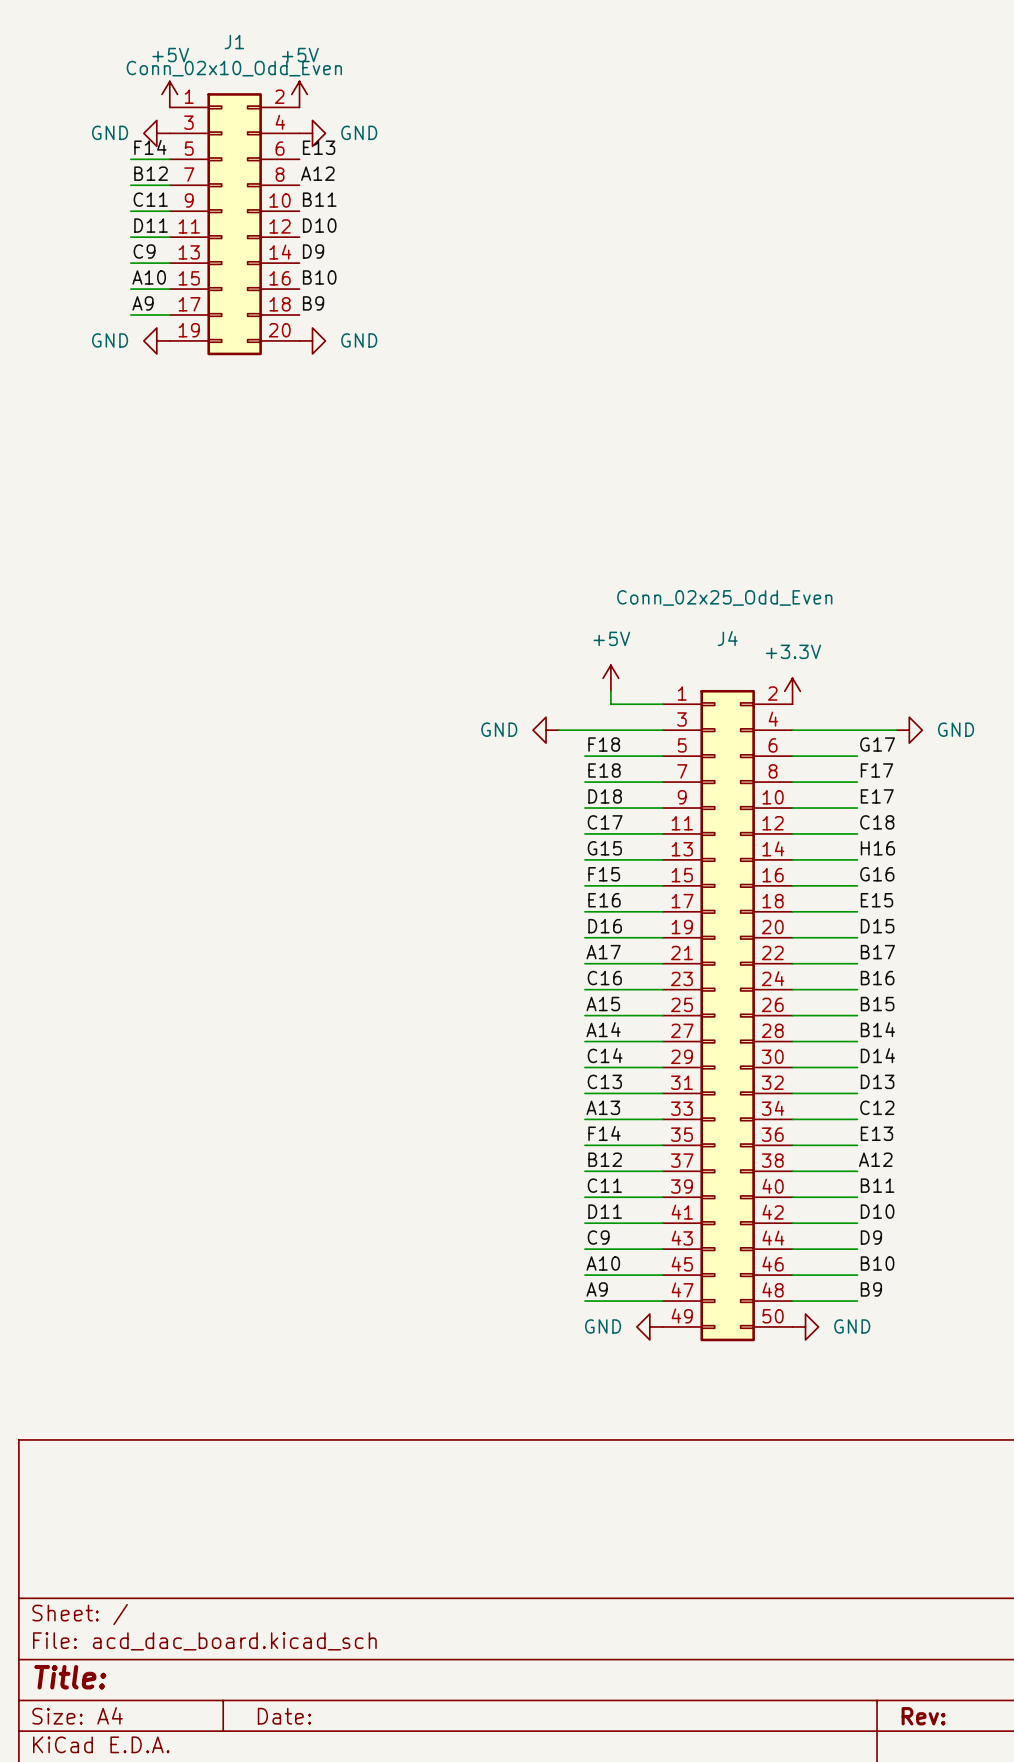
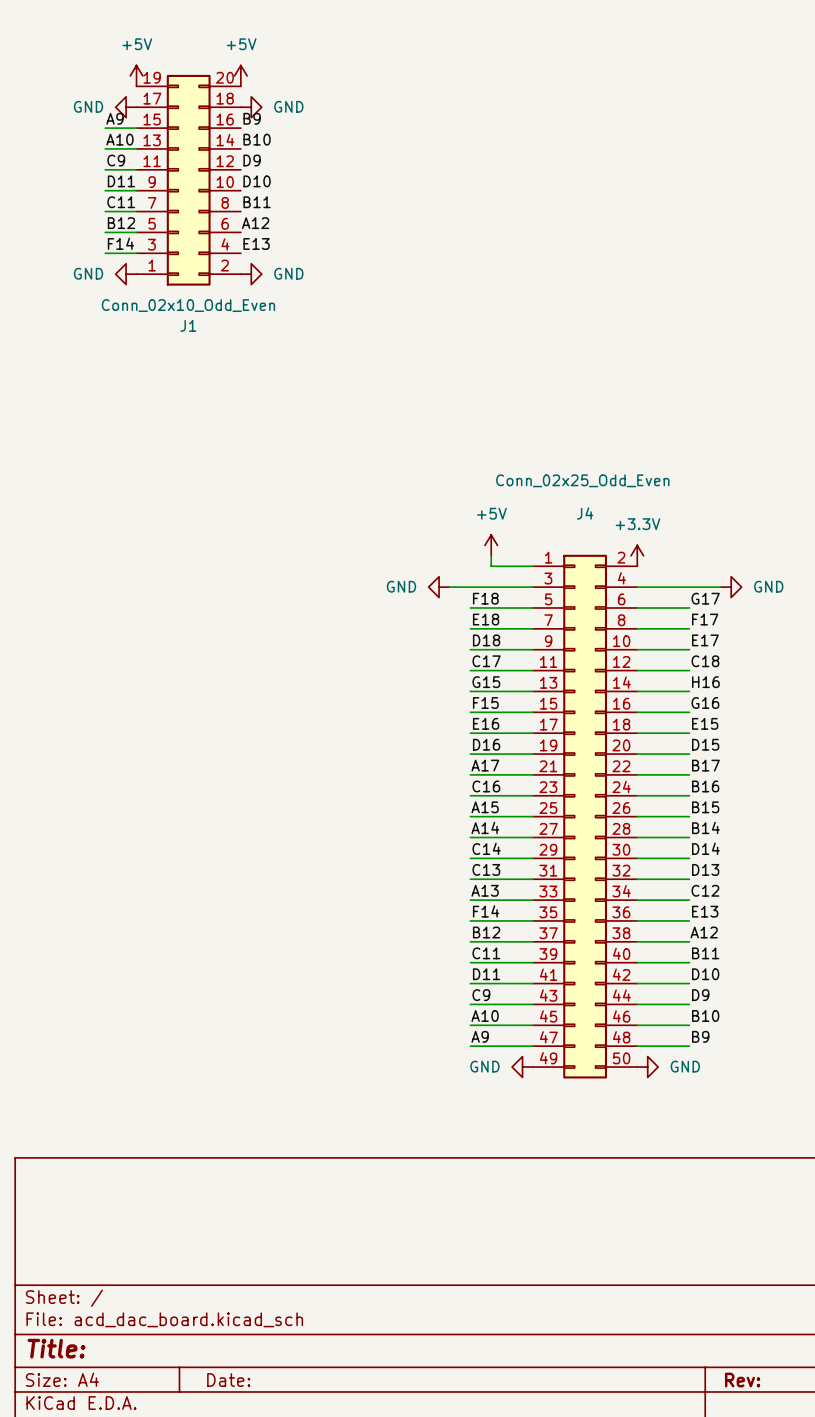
label: F14 (150, 147) -> A9 (114, 118)
label: E13 (319, 147) -> B9 (252, 118)
label: B12 (151, 173) -> A10 (119, 139)
label: A12 (317, 173) -> B10 (257, 139)
label: C11 (150, 199) -> C9 (116, 160)
label: B11 (319, 199) -> D9 (252, 160)
J1 flip: as is (234, 224) -> up-down (188, 180)
label: C9 (144, 251) -> C11 (121, 202)
label: D9 (313, 251) -> B11 (257, 202)
label: A10 (149, 277) -> B12 (121, 223)
label: B10 (319, 277) -> A12 (255, 223)
label: A9 (143, 303) -> F14 (120, 243)
label: B9 (313, 303) -> E13 (256, 243)

